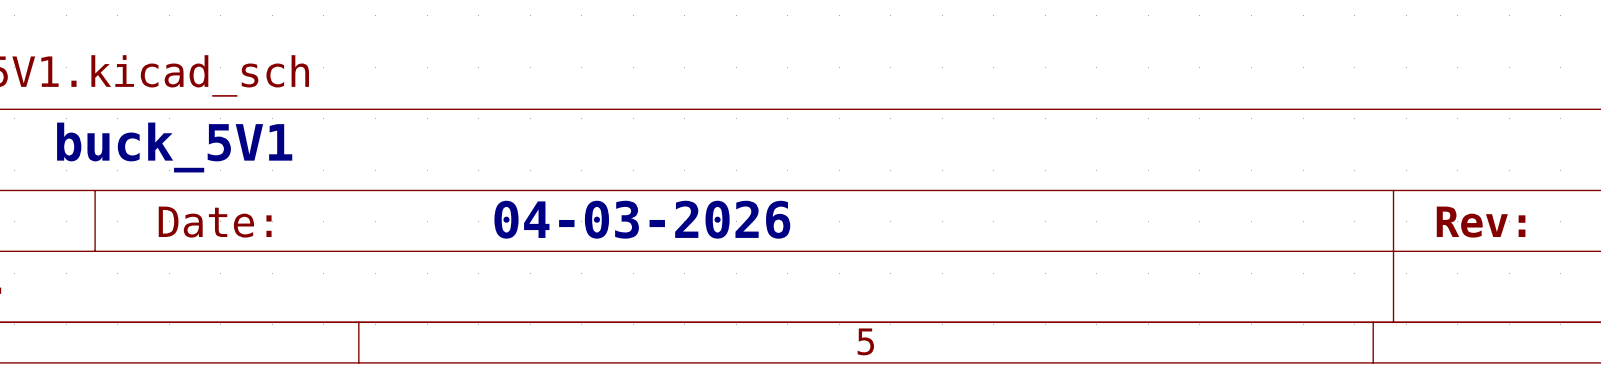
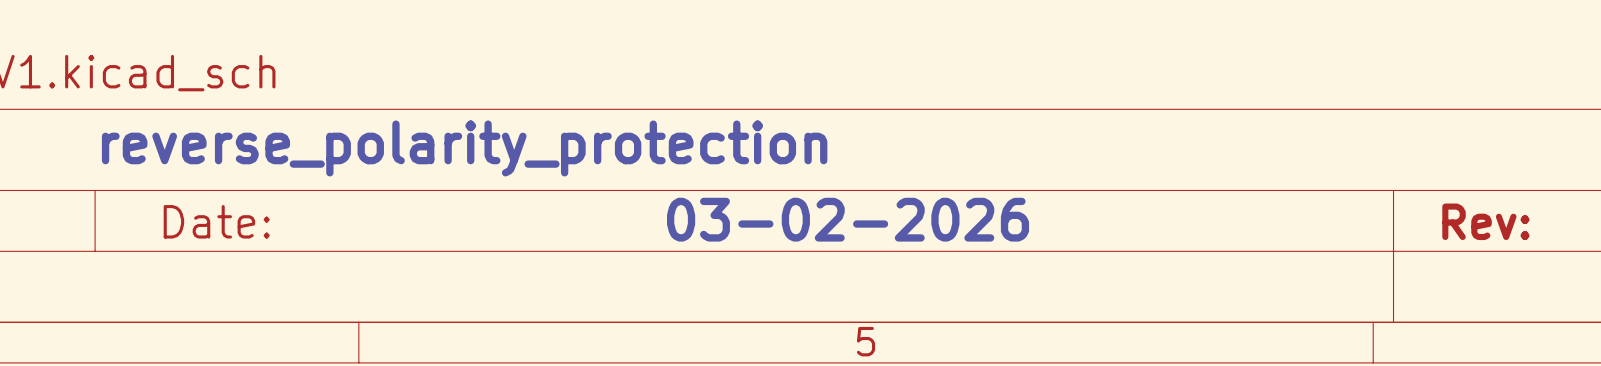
text: none -> reverse_polarity_protection (464, 148)
text: buck_5V1 (174, 147) -> none
text: 04-03-2026 (642, 219) -> 03-02-2026 (848, 219)

